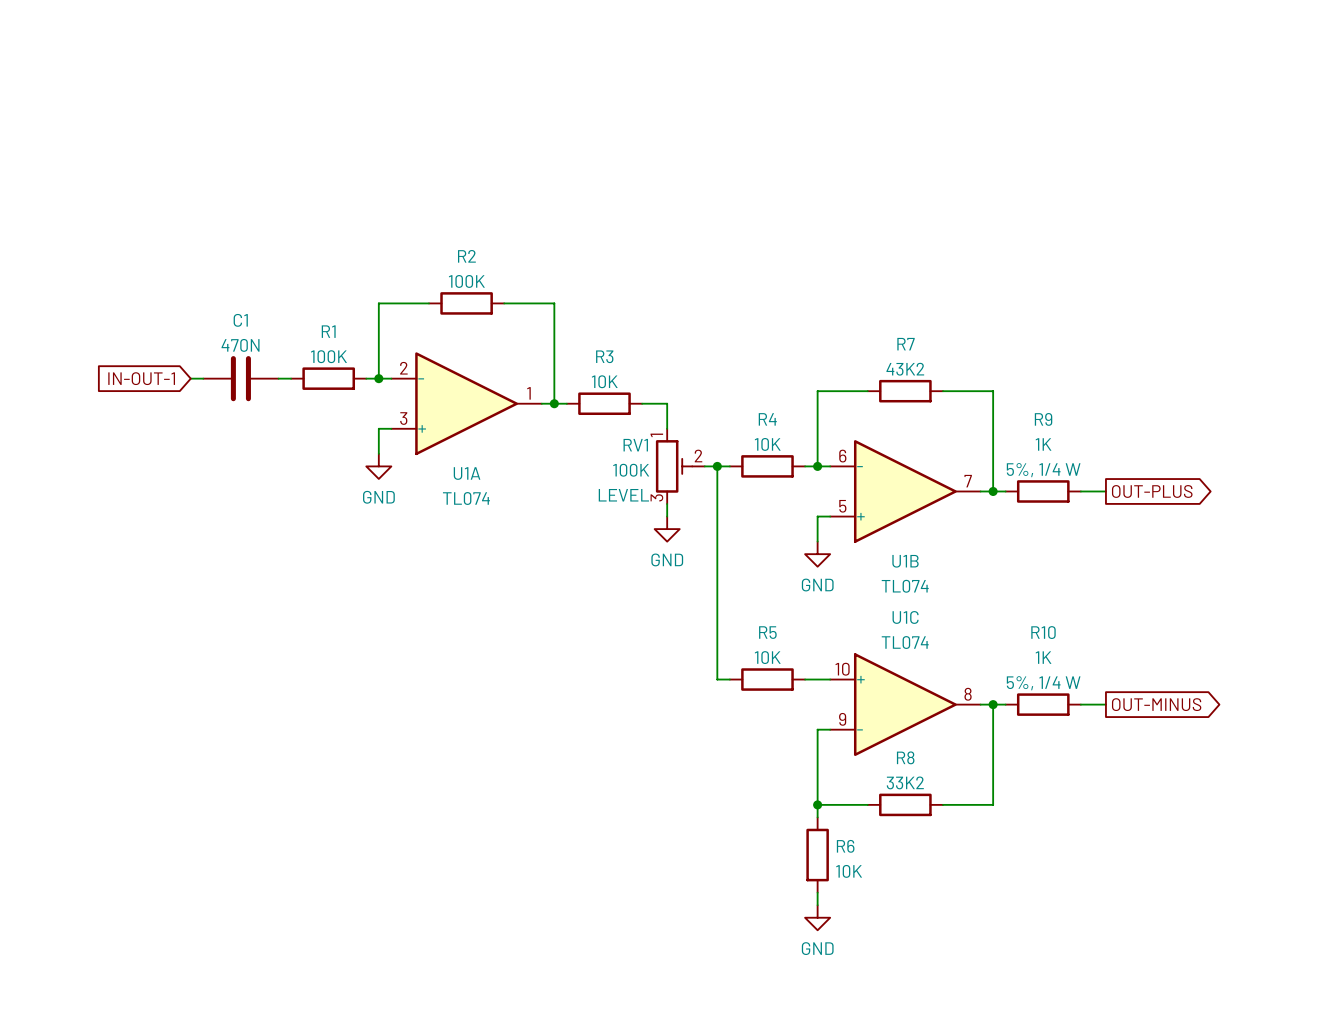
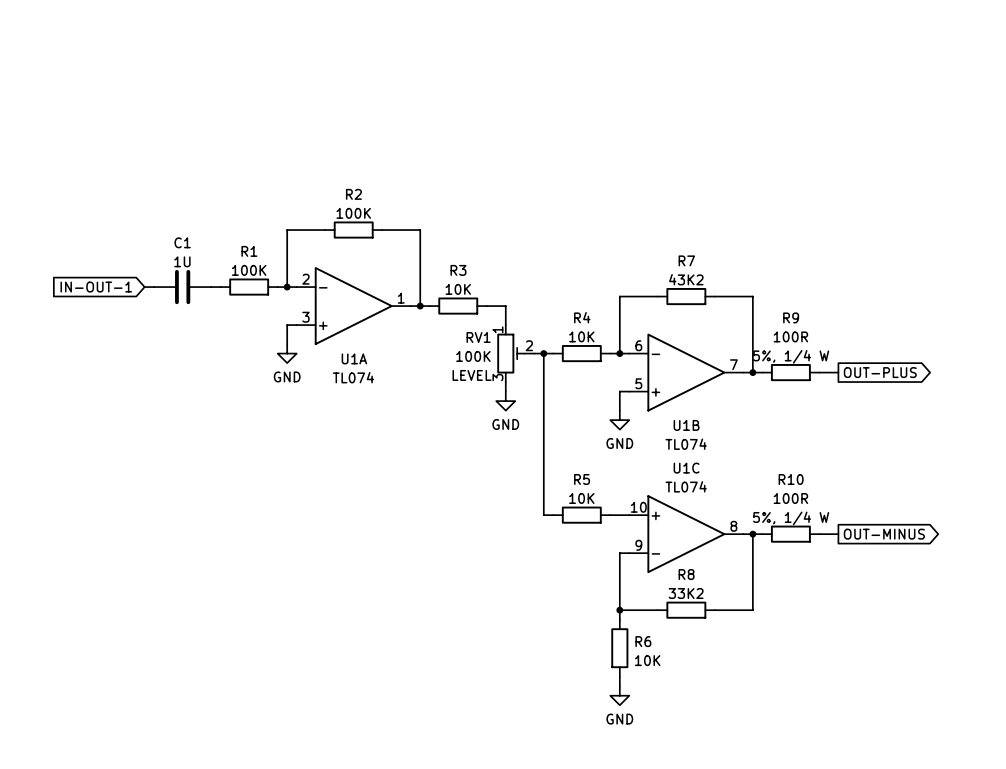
C1 value: 470N (240, 345) -> 1U (182, 261)
R9 value: 1K (1043, 444) -> 100R (790, 336)
R10 value: 1K (1043, 657) -> 100R (790, 498)

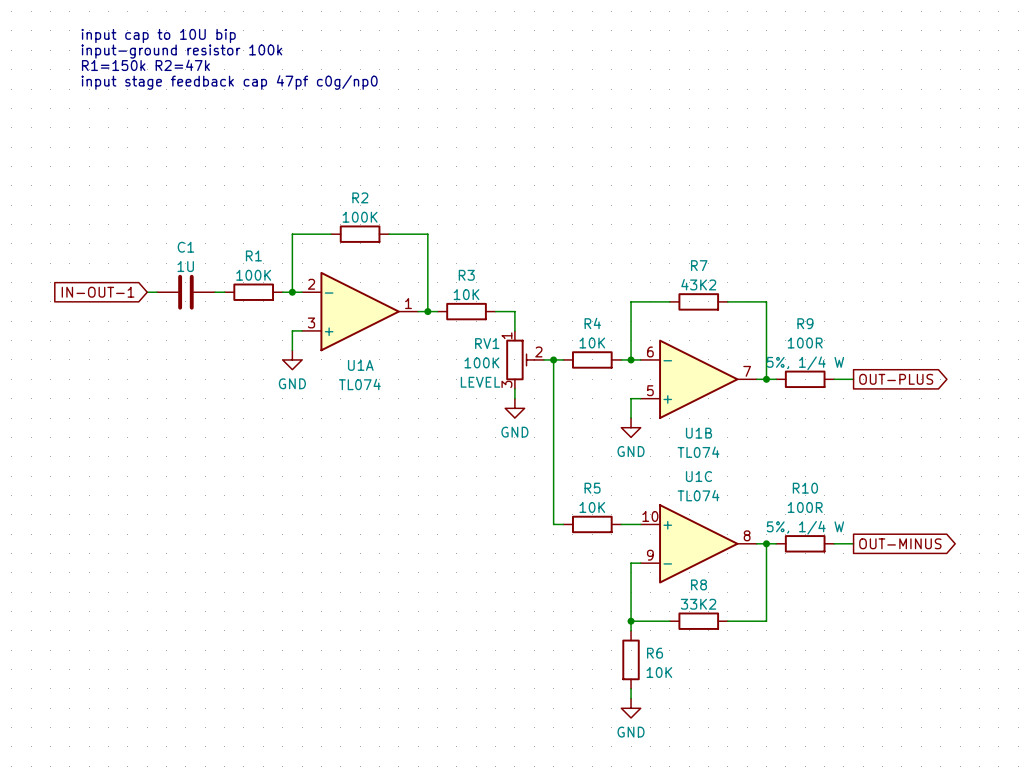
text: none -> input cap to 10U bip (158, 35)
text: none -> input-ground resistor 100k (181, 51)
text: none -> R1=150k R2=47k (145, 65)
text: none -> input stage feedback cap 47pf c0g/np0 (229, 82)

